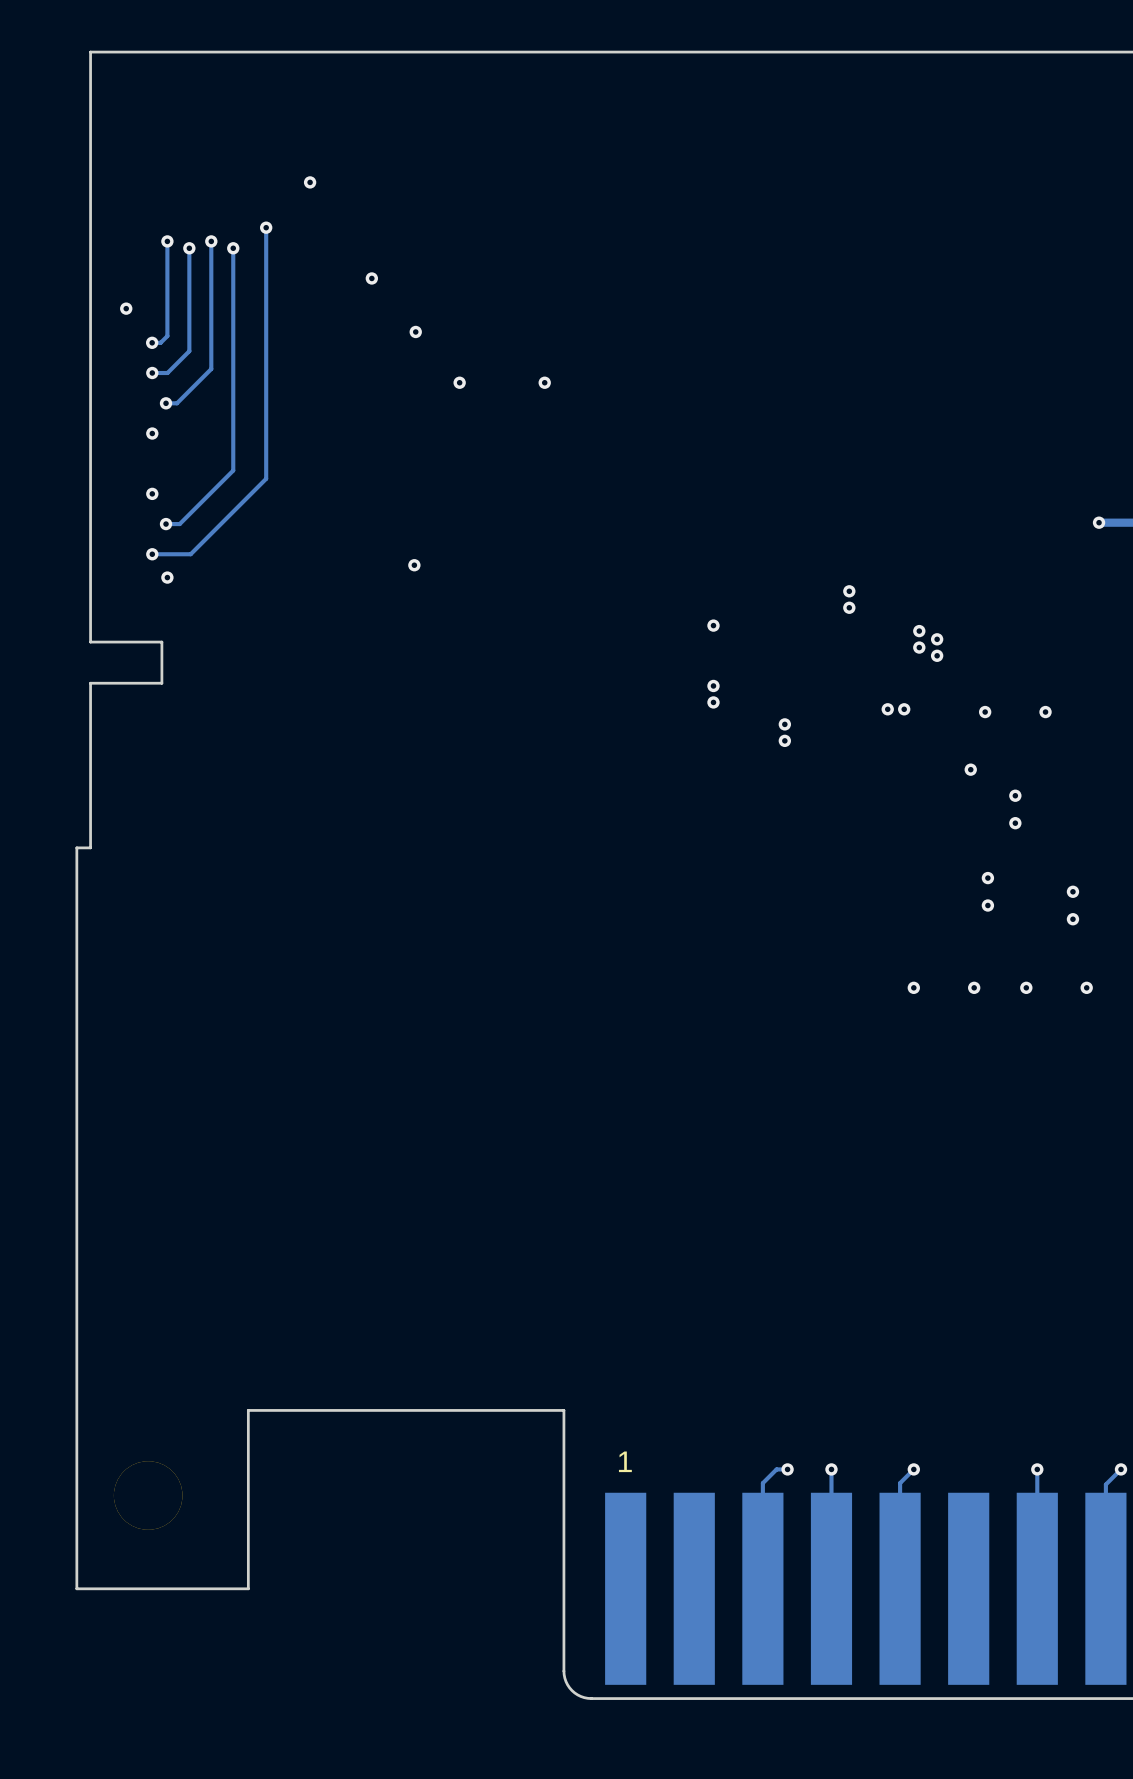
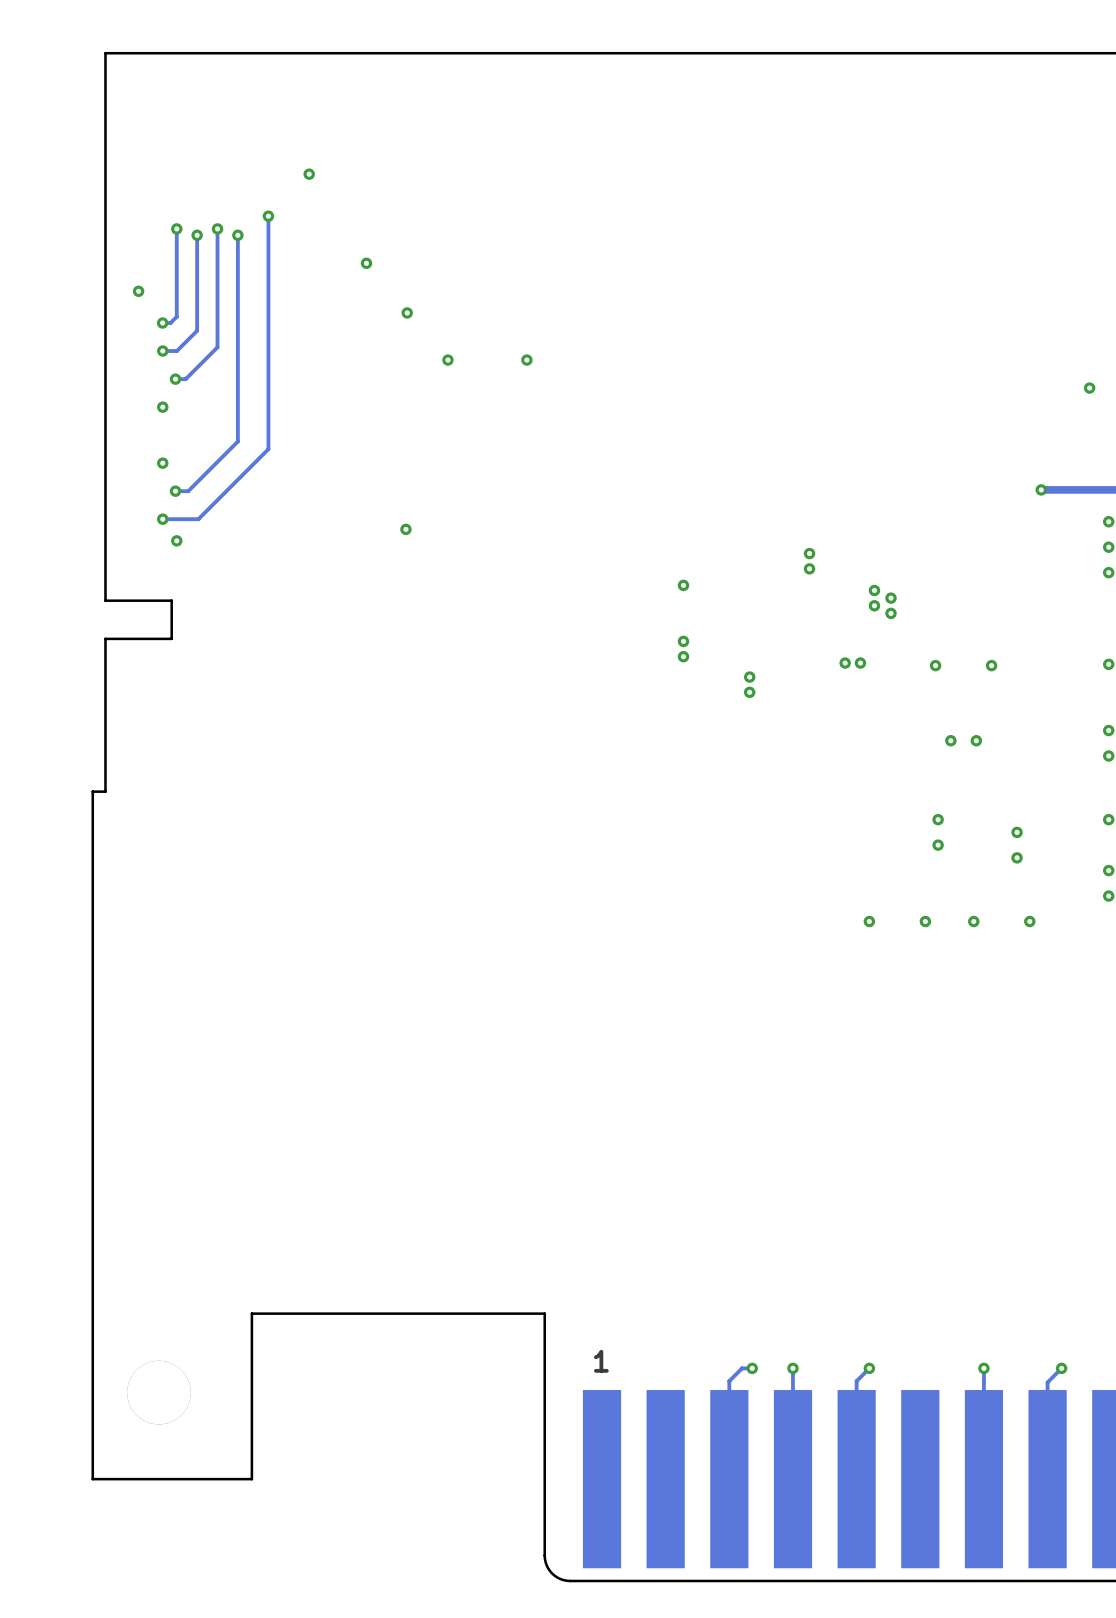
via: (970, 769) -> none
via: none -> (950, 740)
via: none -> (976, 740)
via: (1015, 795) -> none
via: (1015, 823) -> none

